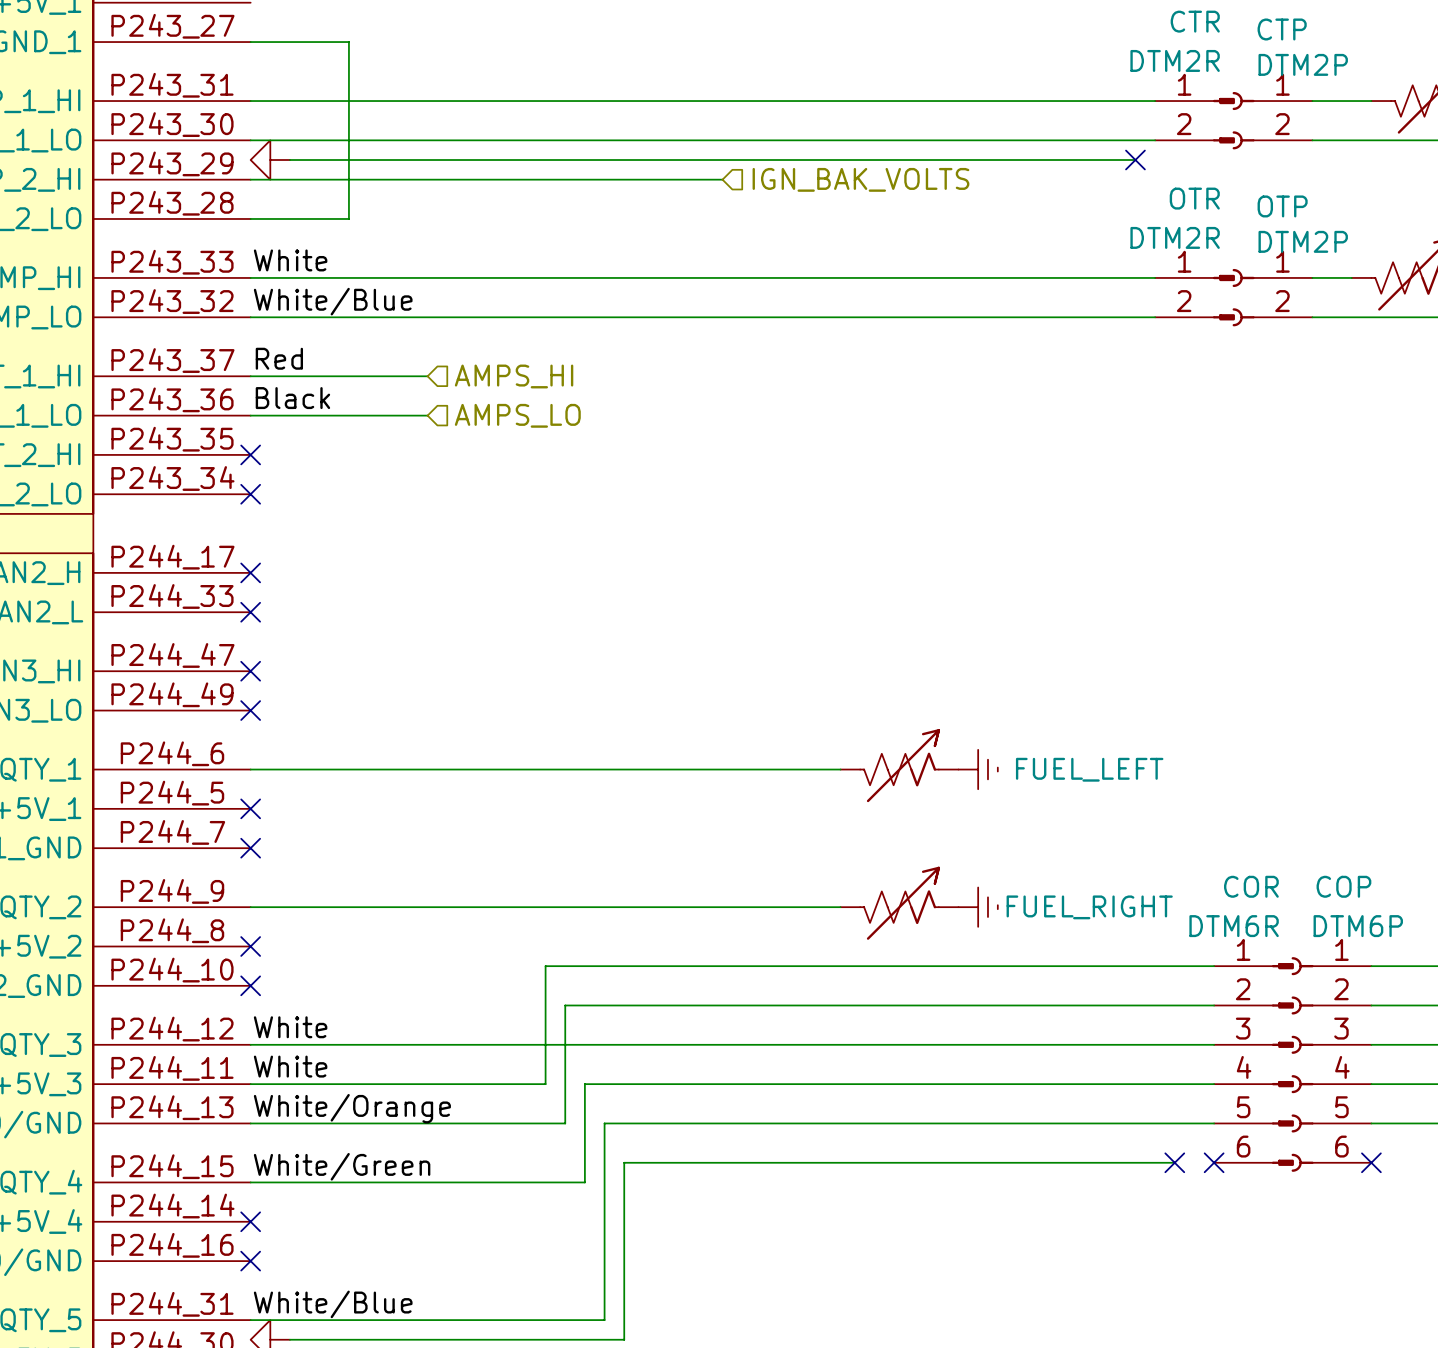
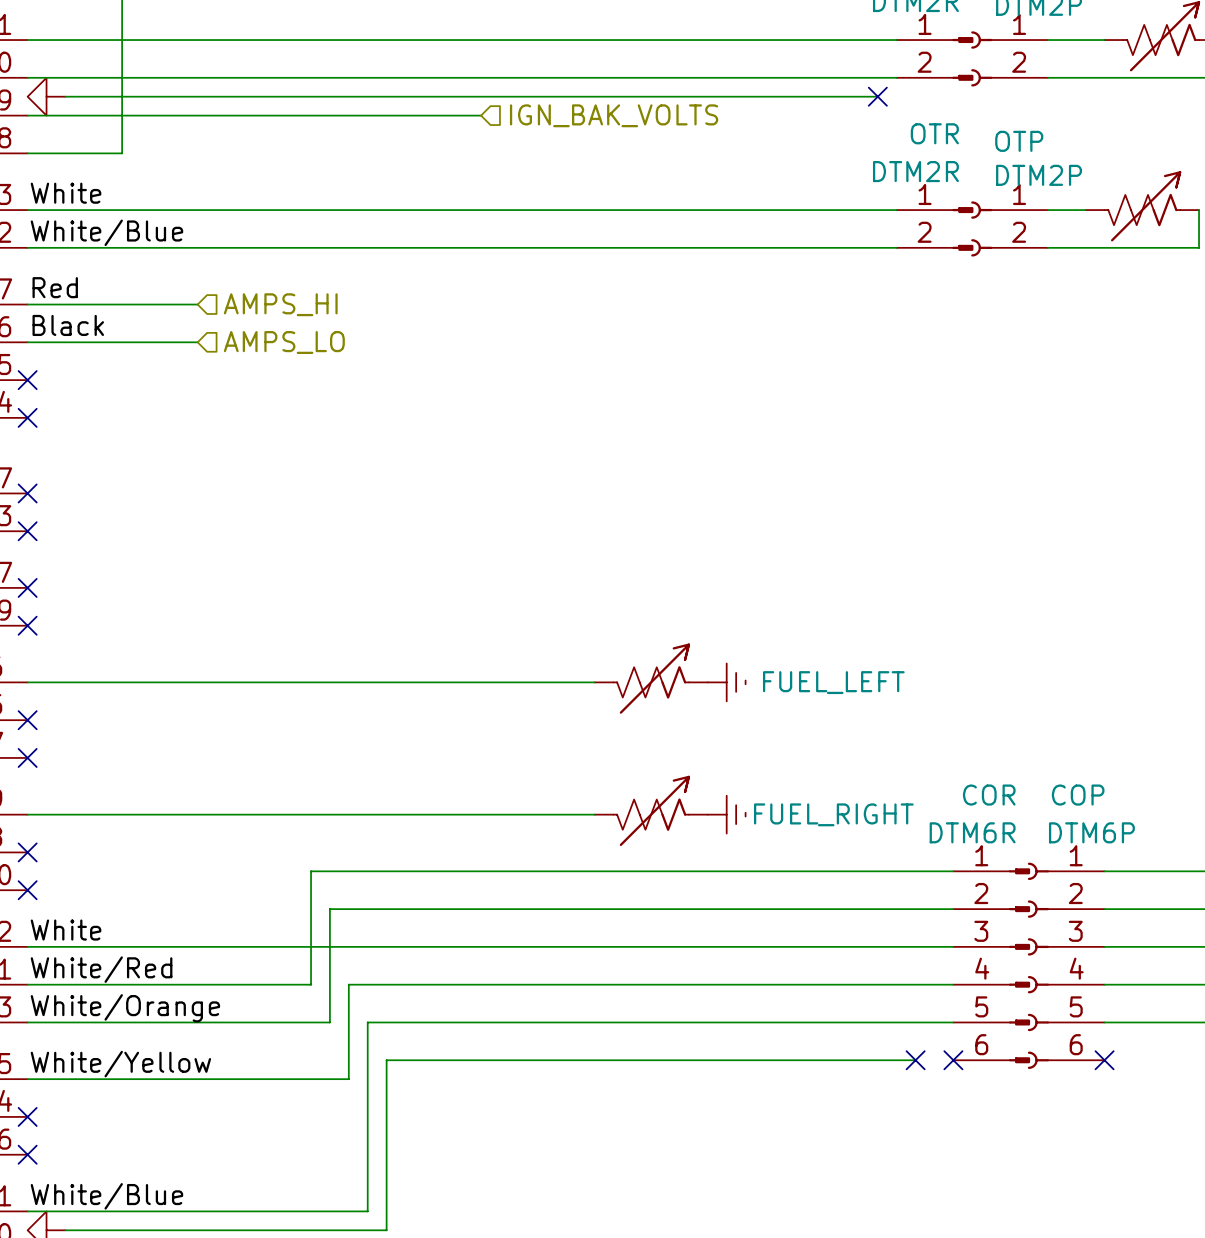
label: White (290, 1066) -> White/Red (101, 969)
label: White/Green (342, 1166) -> White/Yellow (120, 1064)

